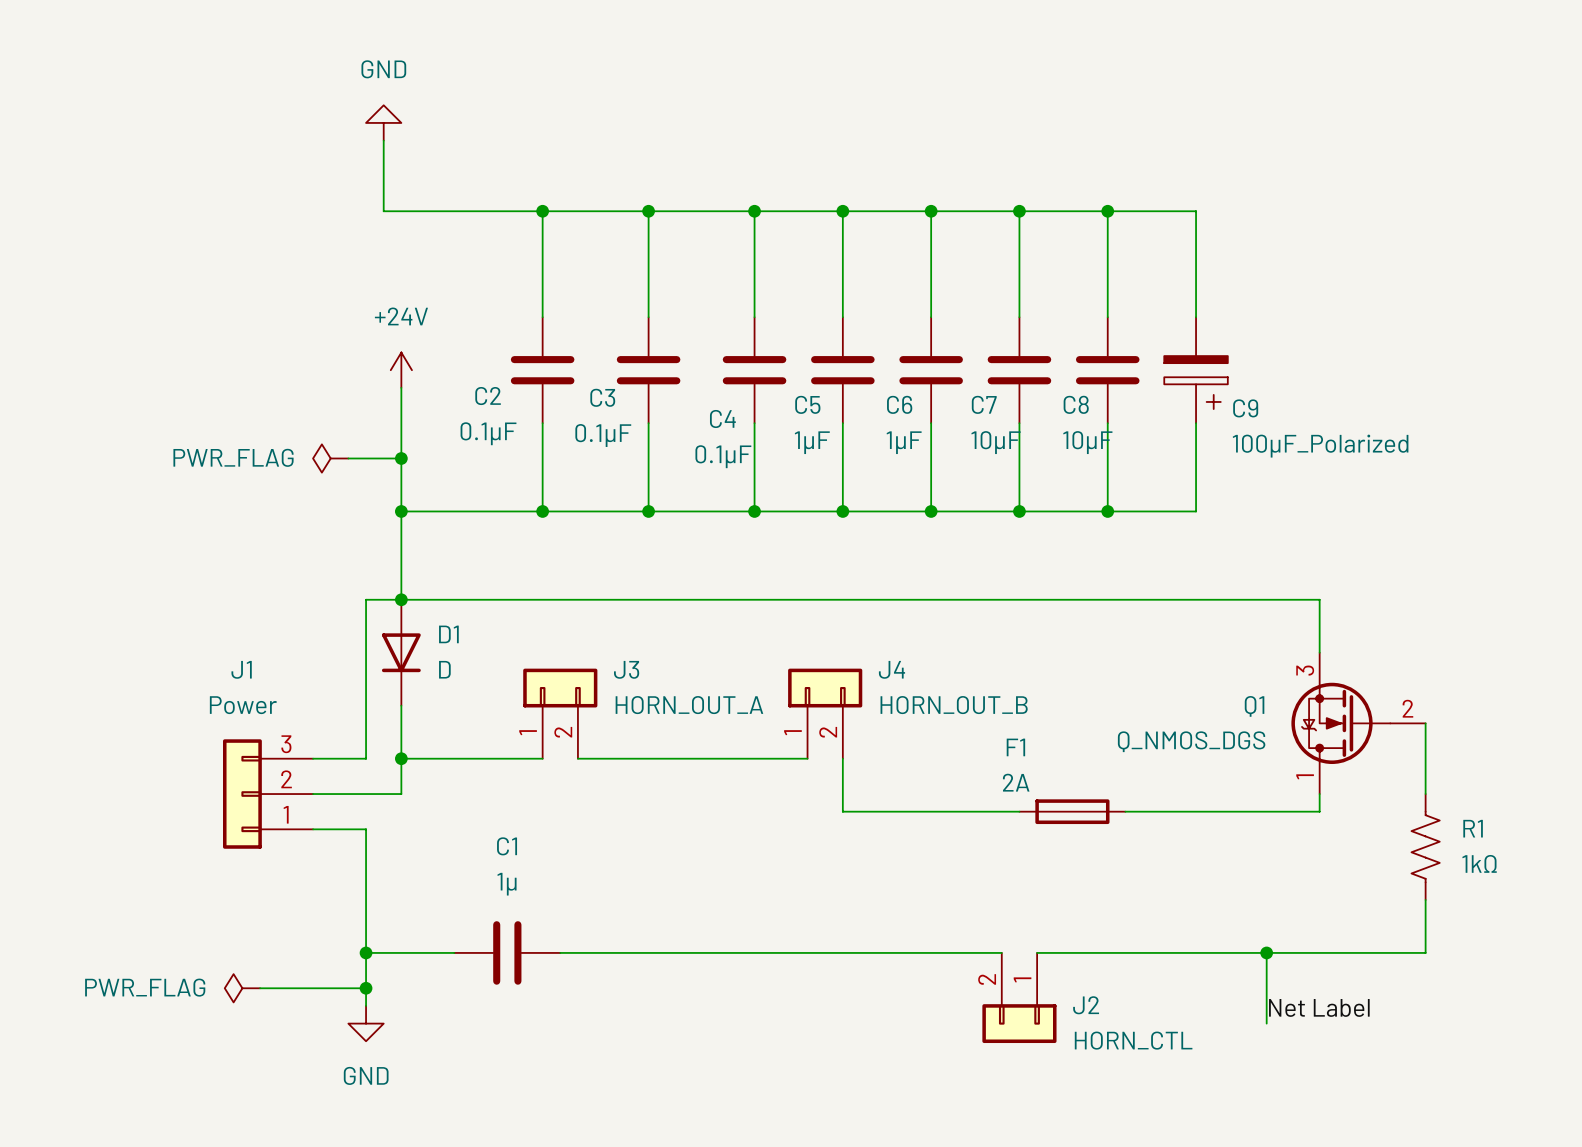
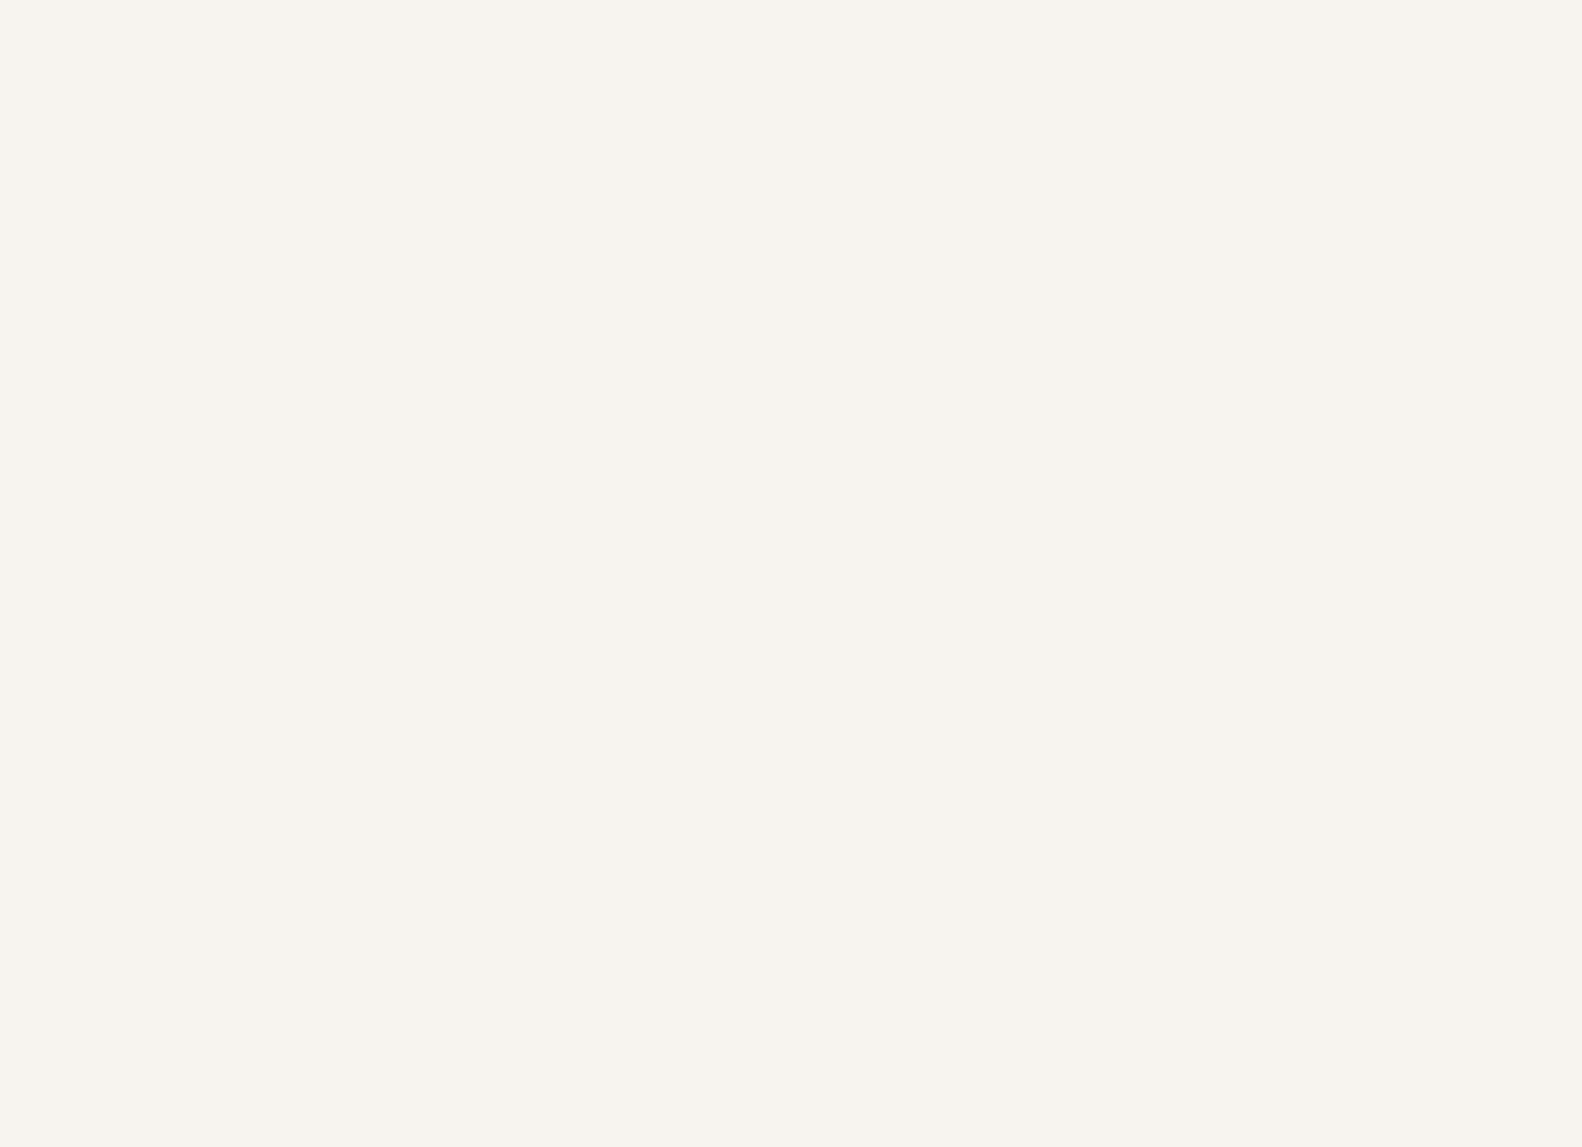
power symbol: GND (383, 122) -> none
wire: (383, 140) (383, 211) (1196, 211) (1196, 317) -> none
wire: (542, 211) (542, 317) -> none
junction: (542, 211) -> none
wire: (648, 211) (648, 317) -> none
junction: (648, 211) -> none
wire: (754, 211) (754, 317) -> none
junction: (754, 211) -> none
wire: (842, 211) (842, 317) -> none
junction: (842, 211) -> none
wire: (931, 211) (931, 317) -> none
junction: (931, 211) -> none
wire: (1019, 211) (1019, 317) -> none
junction: (1019, 211) -> none
wire: (1107, 211) (1107, 317) -> none
junction: (1107, 211) -> none
power symbol: +24V (401, 370) -> none
C2: 0.1μF (542, 370) -> none
C3: 0.1μF (648, 370) -> none
C4: 0.1μF (754, 370) -> none
C5: 1μF (842, 370) -> none
C6: 1μF (931, 370) -> none
C7: 10μF (1019, 370) -> none
C8: 10μF (1107, 370) -> none
C9: 100μF_Polarized (1196, 370) -> none
wire: (401, 387) (401, 599) -> none
wire: (542, 423) (542, 511) -> none
wire: (648, 423) (648, 511) -> none
wire: (754, 423) (754, 511) -> none
wire: (842, 423) (842, 511) -> none
wire: (931, 423) (931, 511) -> none
wire: (1019, 423) (1019, 511) -> none
wire: (1107, 423) (1107, 511) -> none
wire: (1196, 423) (1196, 511) (401, 511) -> none
power symbol: PWR_FLAG (330, 458) -> none
wire: (348, 458) (401, 458) -> none
junction: (401, 458) -> none
junction: (401, 511) -> none
junction: (542, 511) -> none
junction: (648, 511) -> none
junction: (754, 511) -> none
junction: (842, 511) -> none
junction: (931, 511) -> none
junction: (1019, 511) -> none
junction: (1107, 511) -> none
junction: (401, 599) -> none
D1: D (401, 652) -> none
wire: (1319, 652) (1319, 599) (366, 599) (366, 758) (313, 758) -> none
wire: (401, 705) (401, 794) (313, 794) -> none
J3: HORN_OUT_A (560, 713) -> none
J4: HORN_OUT_B (825, 713) -> none
Q1: Q_NMOS_DGS (1358, 723) -> none
wire: (1425, 723) (1425, 794) -> none
wire: (401, 758) (542, 758) -> none
junction: (401, 758) -> none
wire: (577, 758) (807, 758) -> none
wire: (842, 758) (842, 811) (1019, 811) -> none
J1: Power (268, 794) -> none
wire: (1319, 794) (1319, 811) (1125, 811) -> none
F1: 2A (1072, 811) -> none
wire: (313, 829) (366, 829) (366, 1005) -> none
R1: 1kΩ (1425, 847) -> none
wire: (1425, 899) (1425, 952) (1037, 952) -> none
wire: (366, 952) (454, 952) -> none
junction: (366, 952) -> none
C1: 1μ (507, 952) -> none
wire: (560, 952) (1001, 952) -> none
wire: (1266, 952) (1266, 1023) -> none
junction: (1266, 952) -> none
power symbol: PWR_FLAG (242, 988) -> none
wire: (260, 988) (366, 988) -> none
junction: (366, 988) -> none
J2: HORN_CTL (1019, 997) -> none
label: Net Label (1319, 1007) -> none
power symbol: GND (366, 1023) -> none

